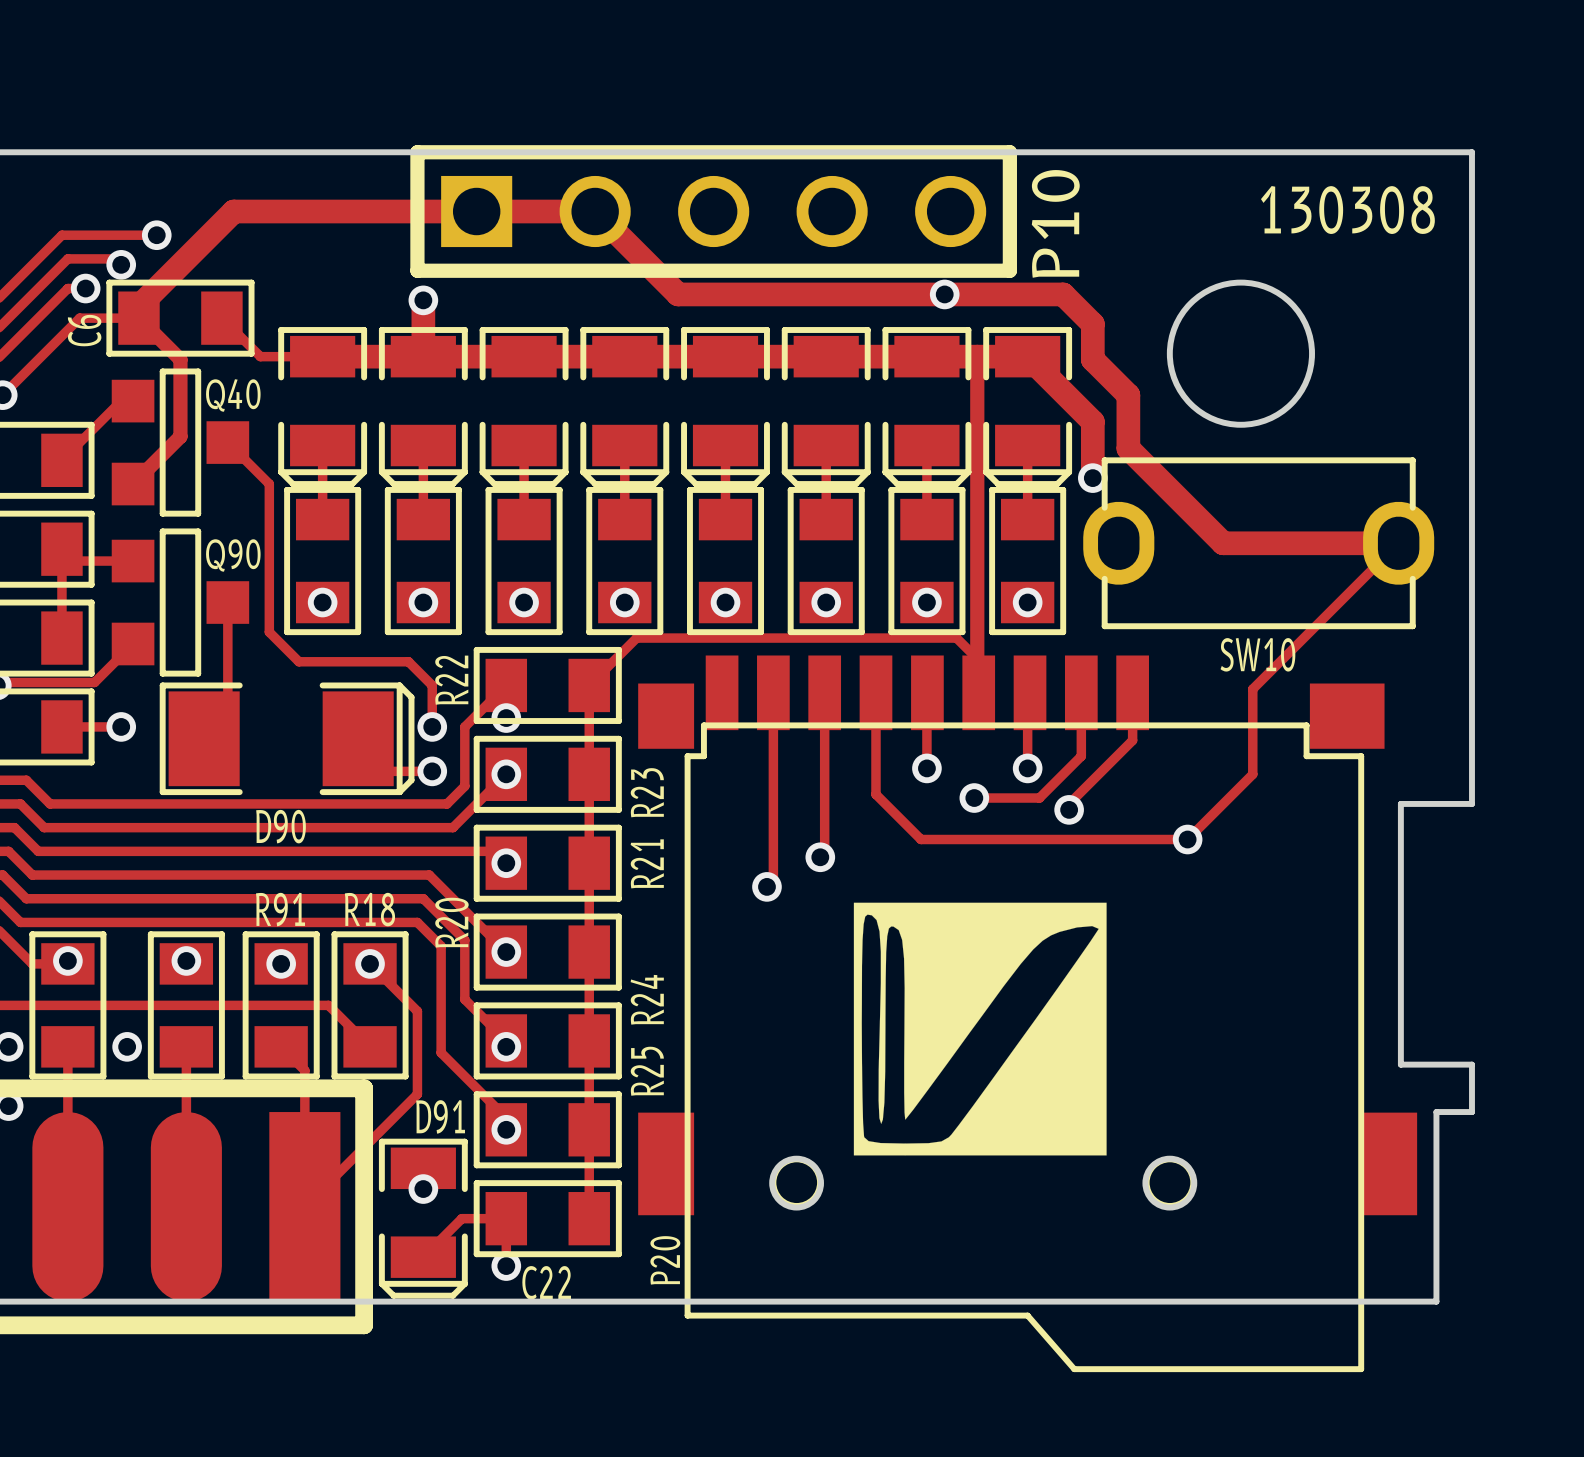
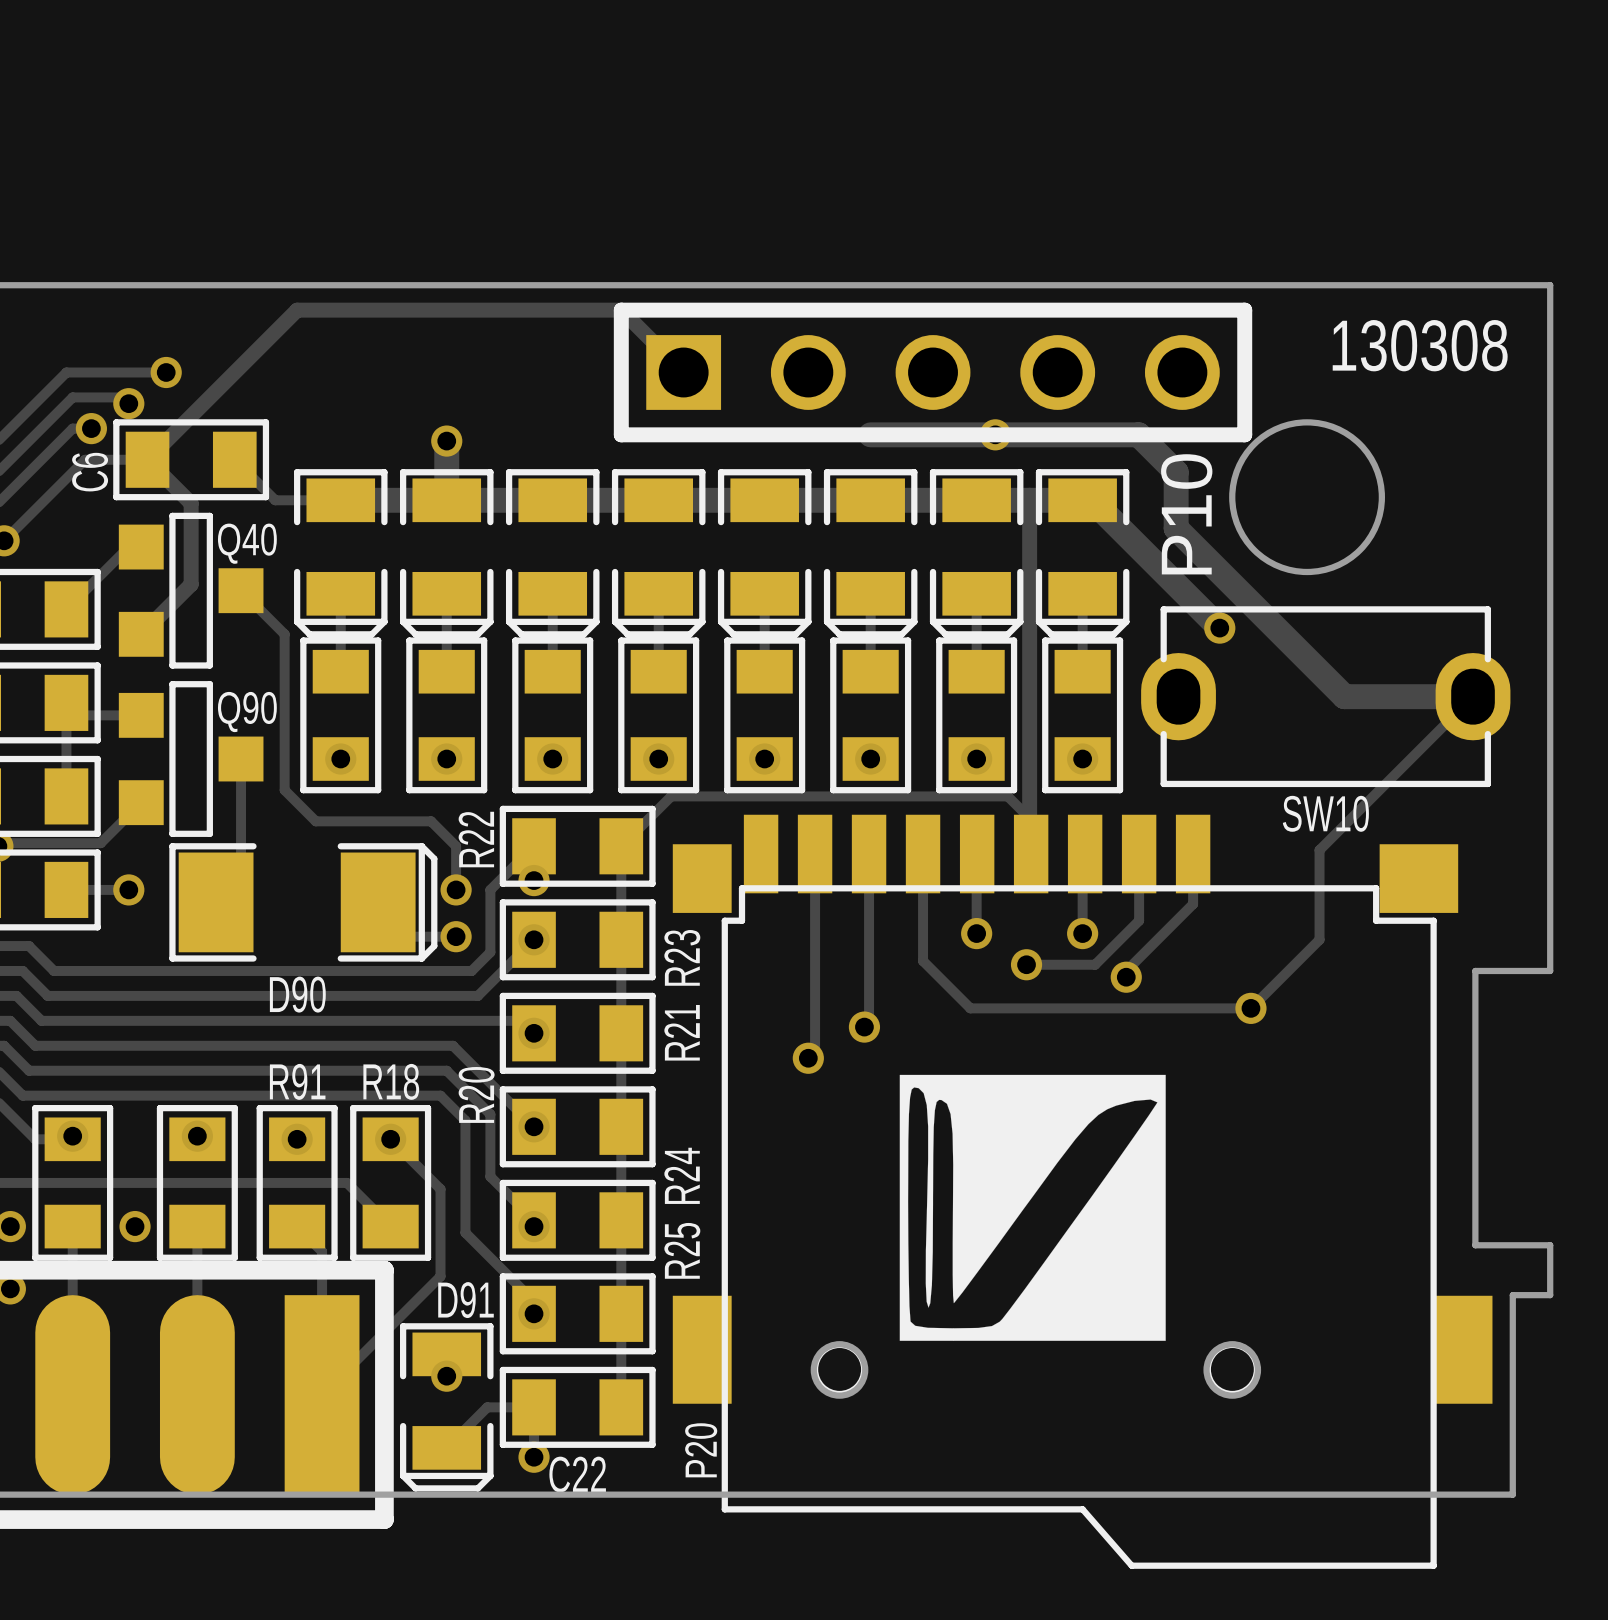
P10 position: (713, 211) -> (933, 372)
P10 name position: P10 (1055, 223) -> P10 (1186, 514)
track: (826, 294) (678, 294) (595, 211) (233, 211) (138, 306) (138, 318) -> (683, 372) (621, 310) (297, 310) (147, 459)
track: (1063, 294) (1092, 324) (1092, 359) (1116, 383) -> (1120, 434) (1138, 434) (1176, 472) (1176, 528)
track: (1027, 356) (1092, 421) (1092, 478) -> (1082, 500) (1091, 500) (1188, 596)
track: (1128, 395) (1128, 448) -> none
via position: (1092, 478) -> (1219, 628)
track: (1157, 478) (1223, 543) (1276, 543) -> (1188, 540) (1344, 696)

